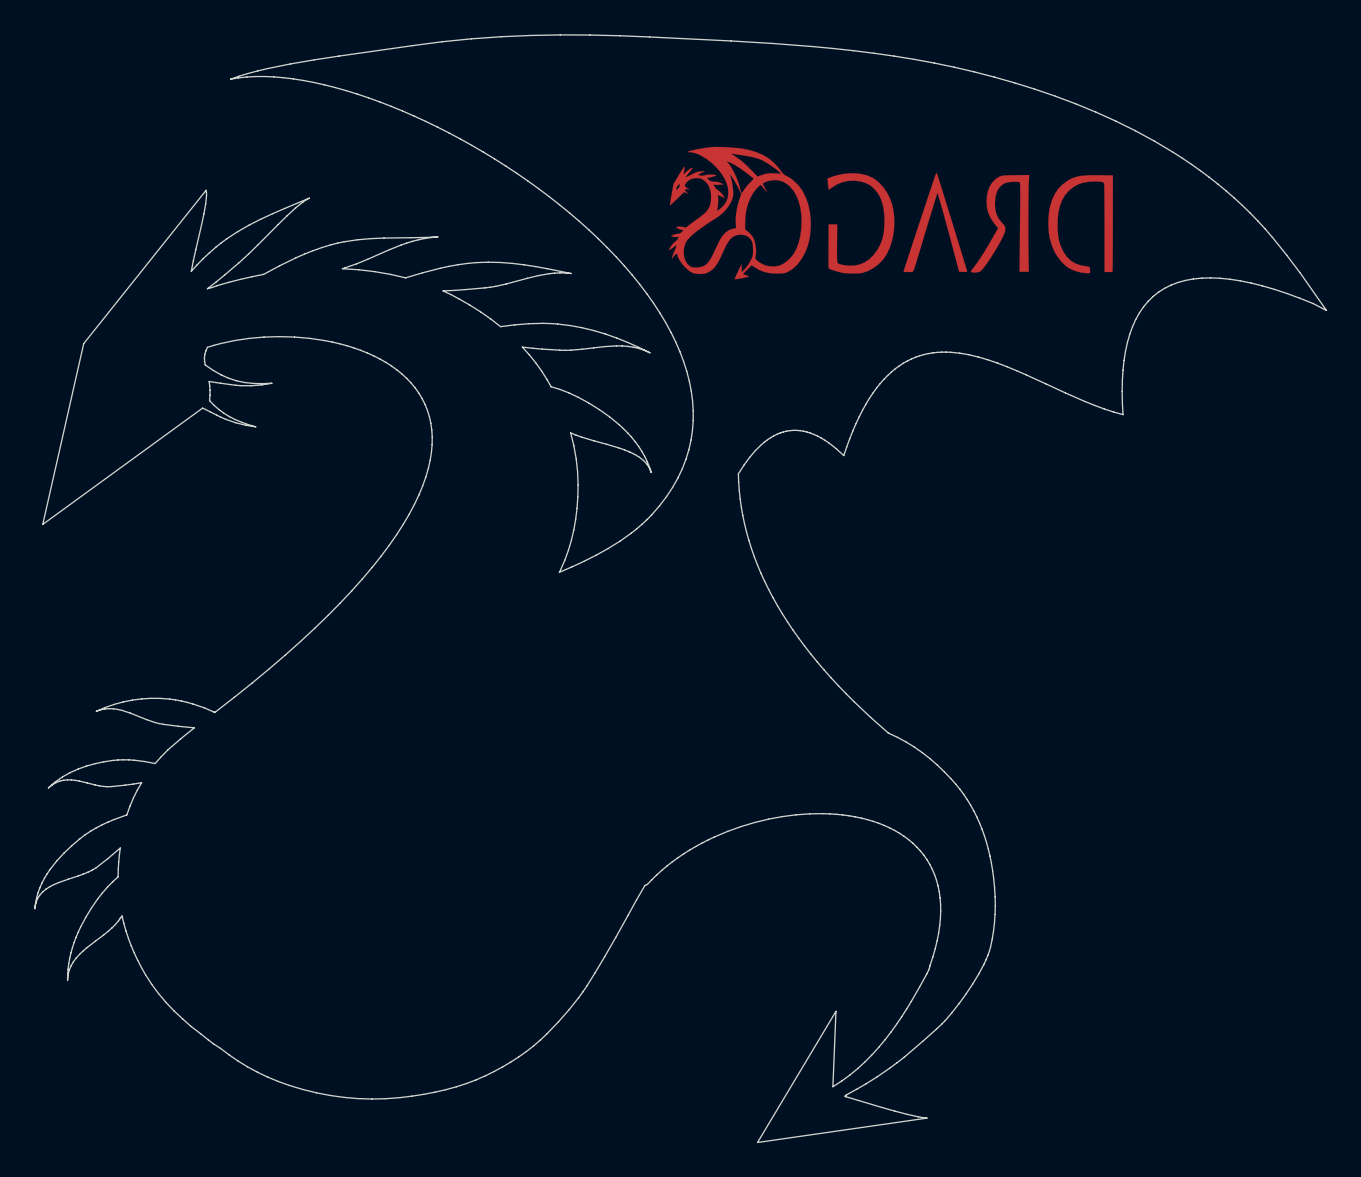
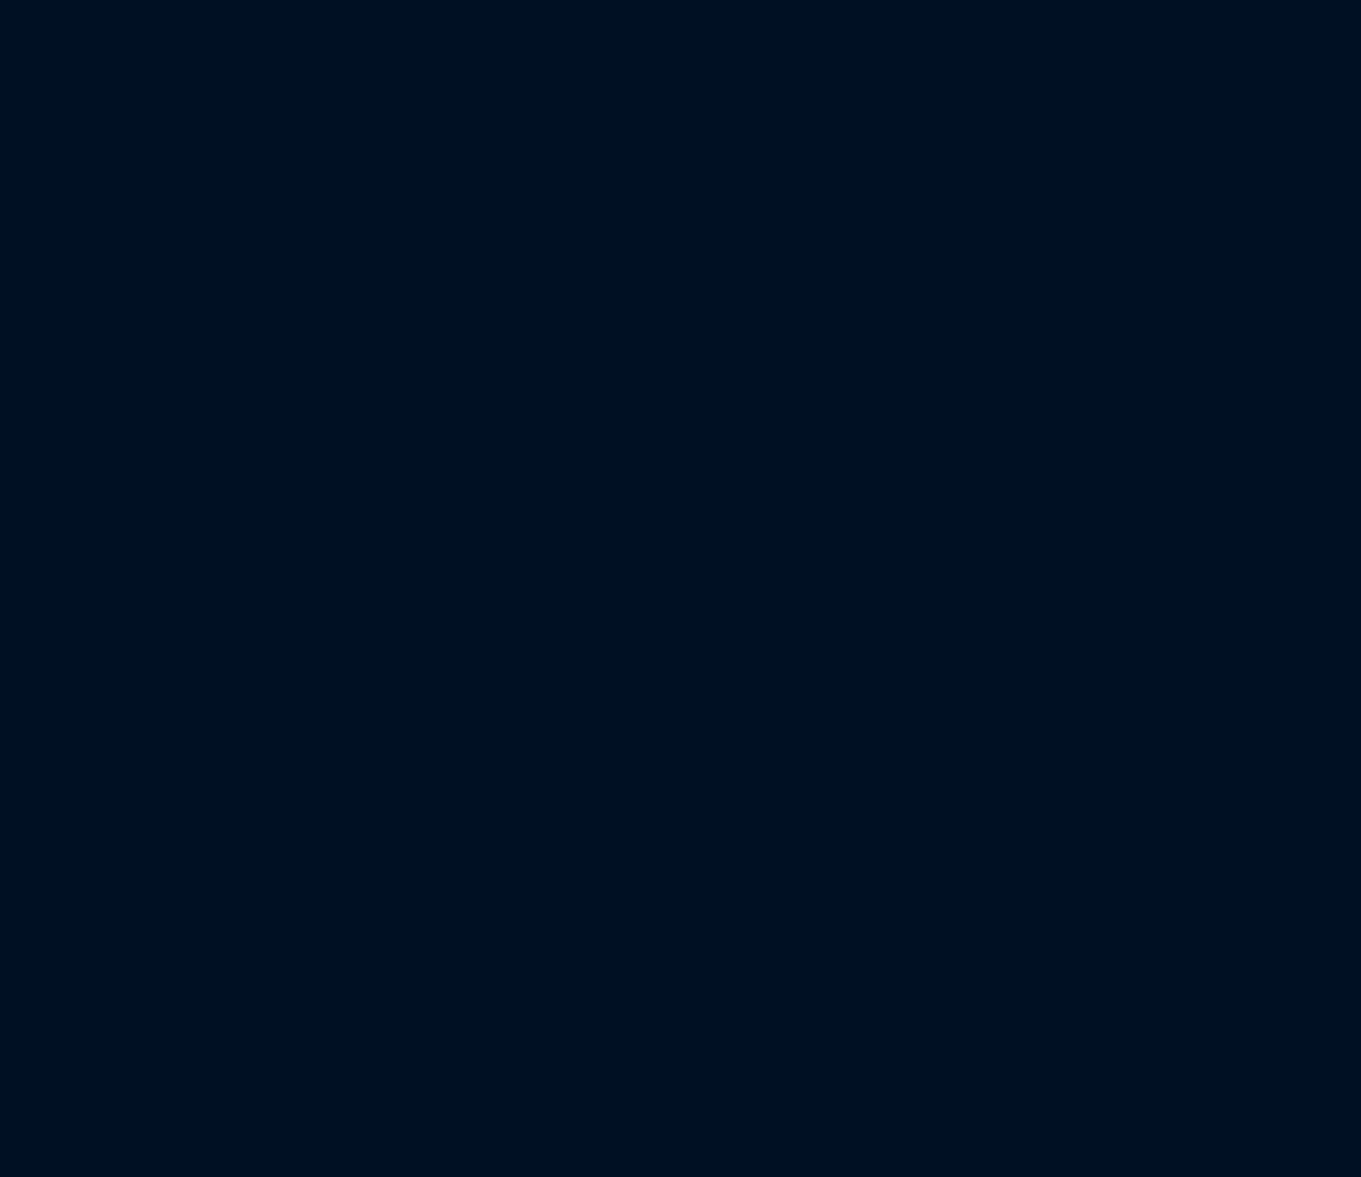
board edge: (560, 34) (730, 40) (853, 50) (954, 67) (1014, 82) (1055, 96) (1135, 130) (1182, 158) (1217, 183) (1250, 213) (1272, 237) (1326, 310) (1286, 293) (1240, 280) (1210, 277) (1178, 282) (1153, 296) (1143, 306) (1132, 326) (1124, 360) (1123, 414) (1084, 401) (987, 359) (959, 353) (932, 352) (915, 357) (903, 363) (880, 383) (859, 416) (843, 455) (828, 442) (814, 434) (800, 430) (786, 431) (773, 435) (761, 444) (738, 473) (741, 507) (751, 548) (768, 589) (792, 629) (824, 669) (870, 717) (888, 733) (922, 752) (951, 779) (970, 805) (986, 842) (993, 878) (995, 914) (990, 946) (978, 974) (959, 1003) (936, 1029) (889, 1068) (845, 1096) (894, 1111) (926, 1118) (757, 1142) (835, 1011) (832, 1086) (857, 1068) (885, 1039) (906, 1009) (929, 967) (937, 940) (940, 911) (939, 891) (932, 869) (920, 850) (904, 836) (884, 825) (861, 818) (823, 813) (796, 814) (768, 819) (727, 831) (689, 850) (666, 866) (644, 885) (582, 991) (558, 1021) (533, 1045) (502, 1066) (476, 1079) (445, 1089) (399, 1097) (358, 1098) (316, 1092) (278, 1081) (238, 1061) (190, 1026) (158, 993) (134, 953) (122, 915) (111, 928) (76, 957) (69, 970) (67, 980) (70, 952) (80, 927) (97, 899) (118, 876) (120, 848) (92, 870) (46, 889) (38, 897) (34, 908) (41, 882) (56, 860) (71, 845) (90, 831) (126, 814) (141, 782) (107, 786) (67, 779) (55, 782) (48, 787) (70, 772) (95, 763) (123, 759) (155, 763) (194, 727) (159, 723) (117, 709) (105, 708) (96, 711) (123, 701) (160, 698) (187, 702) (214, 712) (300, 641) (362, 578) (403, 524) (418, 495) (428, 468) (432, 437) (427, 410) (415, 388) (396, 369) (367, 352) (332, 342) (294, 337) (249, 338) (207, 347) (204, 361) (205, 364) (213, 370) (236, 380) (271, 383) (240, 385) (209, 381) (209, 400) (214, 405) (229, 416) (255, 426) (225, 419) (202, 408) (42, 524) (83, 343) (206, 190) (203, 213) (191, 271) (216, 246) (237, 231) (260, 219) (309, 198) (295, 207) (248, 254) (207, 288) (263, 274) (304, 254) (337, 243) (370, 238) (437, 236) (406, 243) (342, 268) (374, 271) (405, 277) (448, 266) (488, 262) (523, 264) (571, 273) (549, 273) (490, 287) (443, 290) (469, 305) (500, 326) (543, 323) (570, 325) (605, 333) (627, 342) (649, 352) (638, 348) (622, 345) (565, 350) (522, 347) (535, 362) (551, 386) (588, 402) (623, 428) (641, 451) (647, 461) (649, 466) (651, 472) (646, 464) (634, 454) (570, 432) (577, 471) (577, 508) (571, 540) (559, 572) (596, 555) (631, 533) (651, 514) (672, 487) (686, 459) (692, 430) (692, 400) (683, 361) (670, 332) (646, 293) (624, 265) (588, 229) (549, 196) (505, 165) (460, 138) (402, 111) (346, 90) (303, 80) (264, 76) (230, 79) (290, 63) (412, 45) (471, 38) (560, 34) -> none
drawing: [668, 146, 1113, 280] -> none

